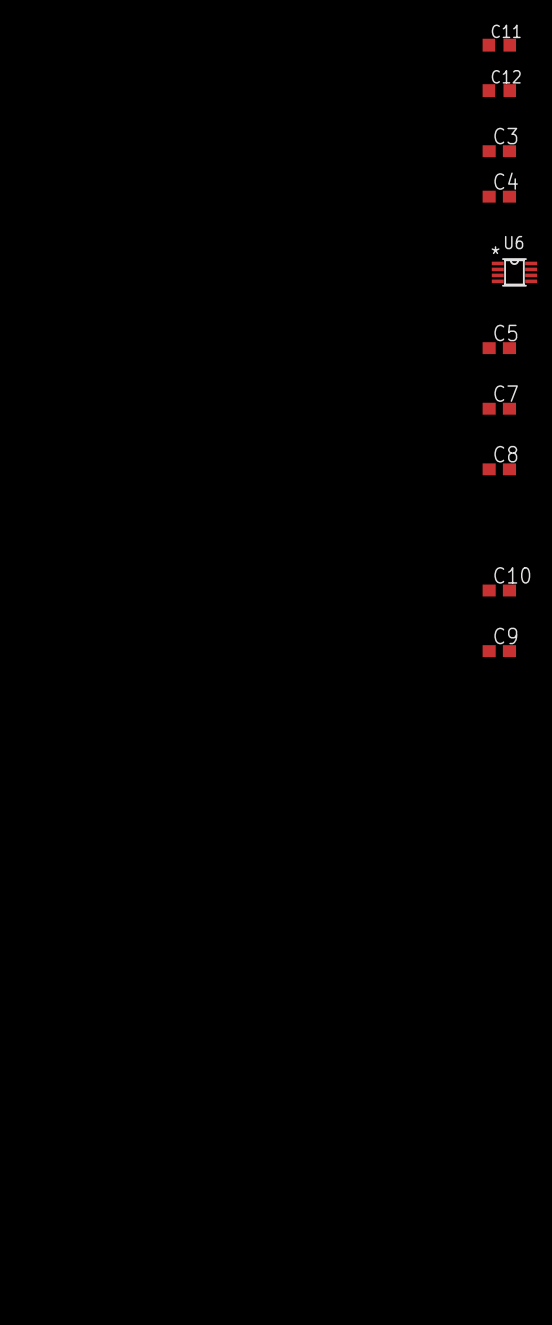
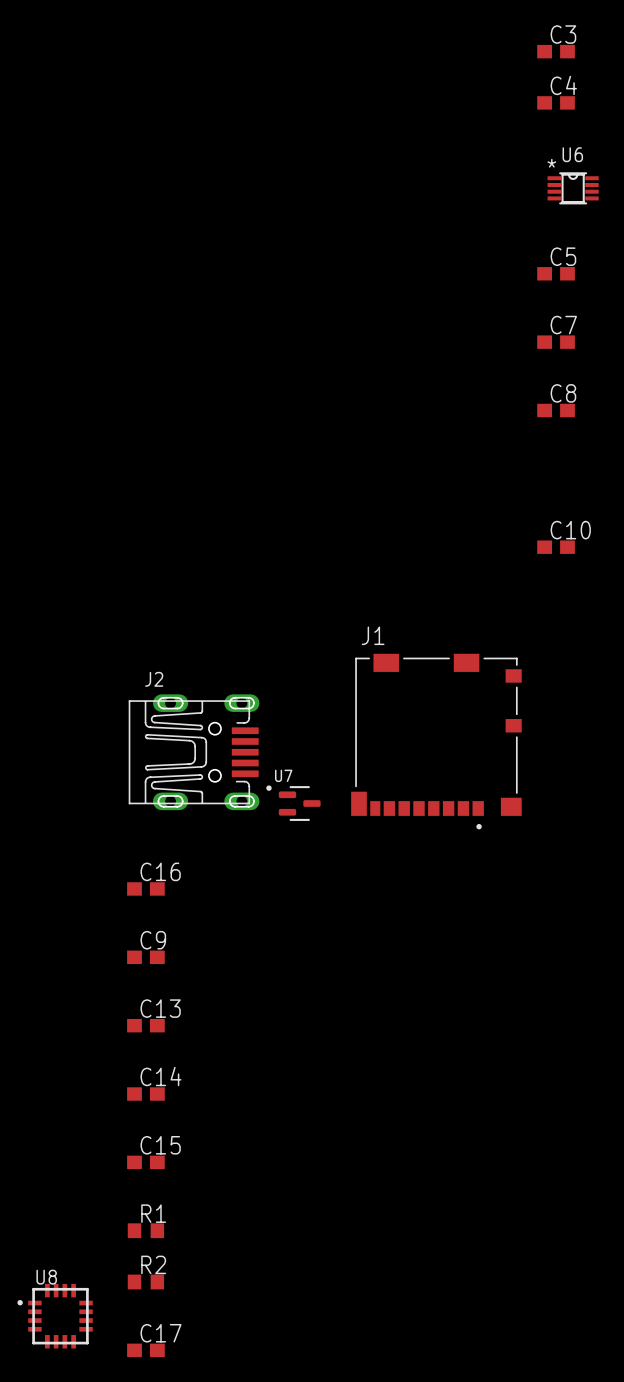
C9 position: (499, 651) -> (145, 957)
J1: none -> (436, 741)
J2: none -> (194, 752)
U7: none -> (293, 803)
C16: none -> (145, 888)
C13: none -> (145, 1025)
C14: none -> (145, 1094)
C15: none -> (145, 1162)
R1: none -> (145, 1230)
R2: none -> (145, 1281)
U8: none -> (55, 1316)
C17: none -> (145, 1350)

